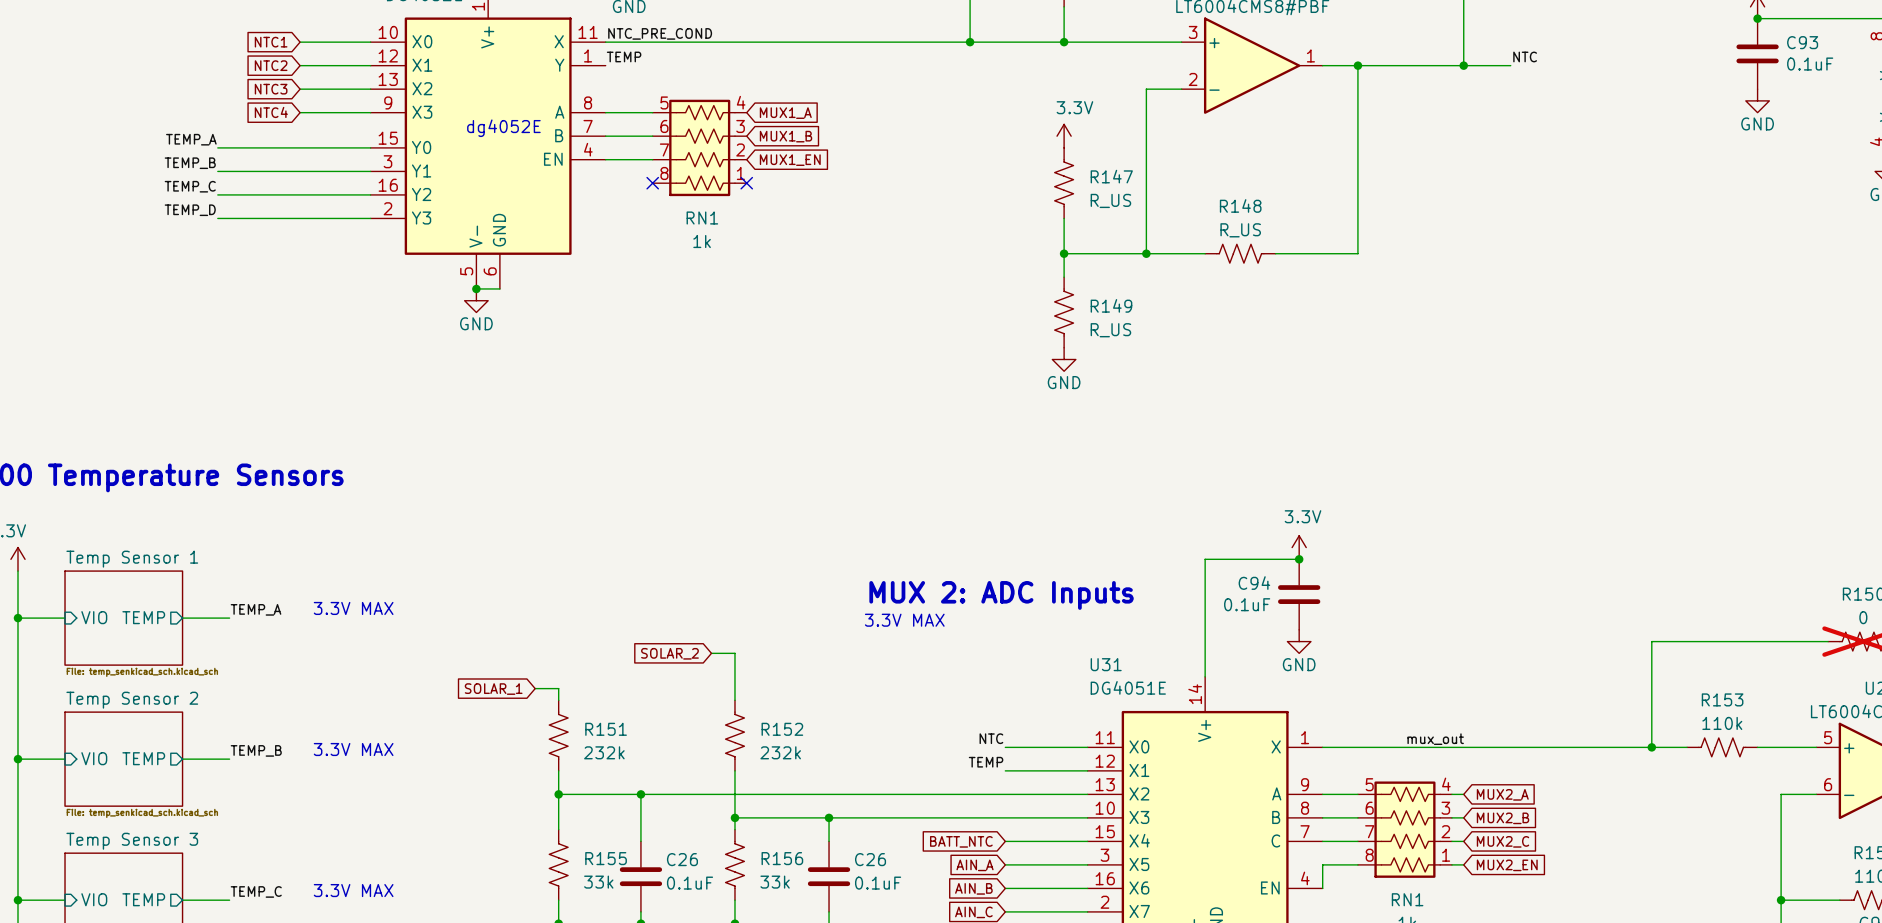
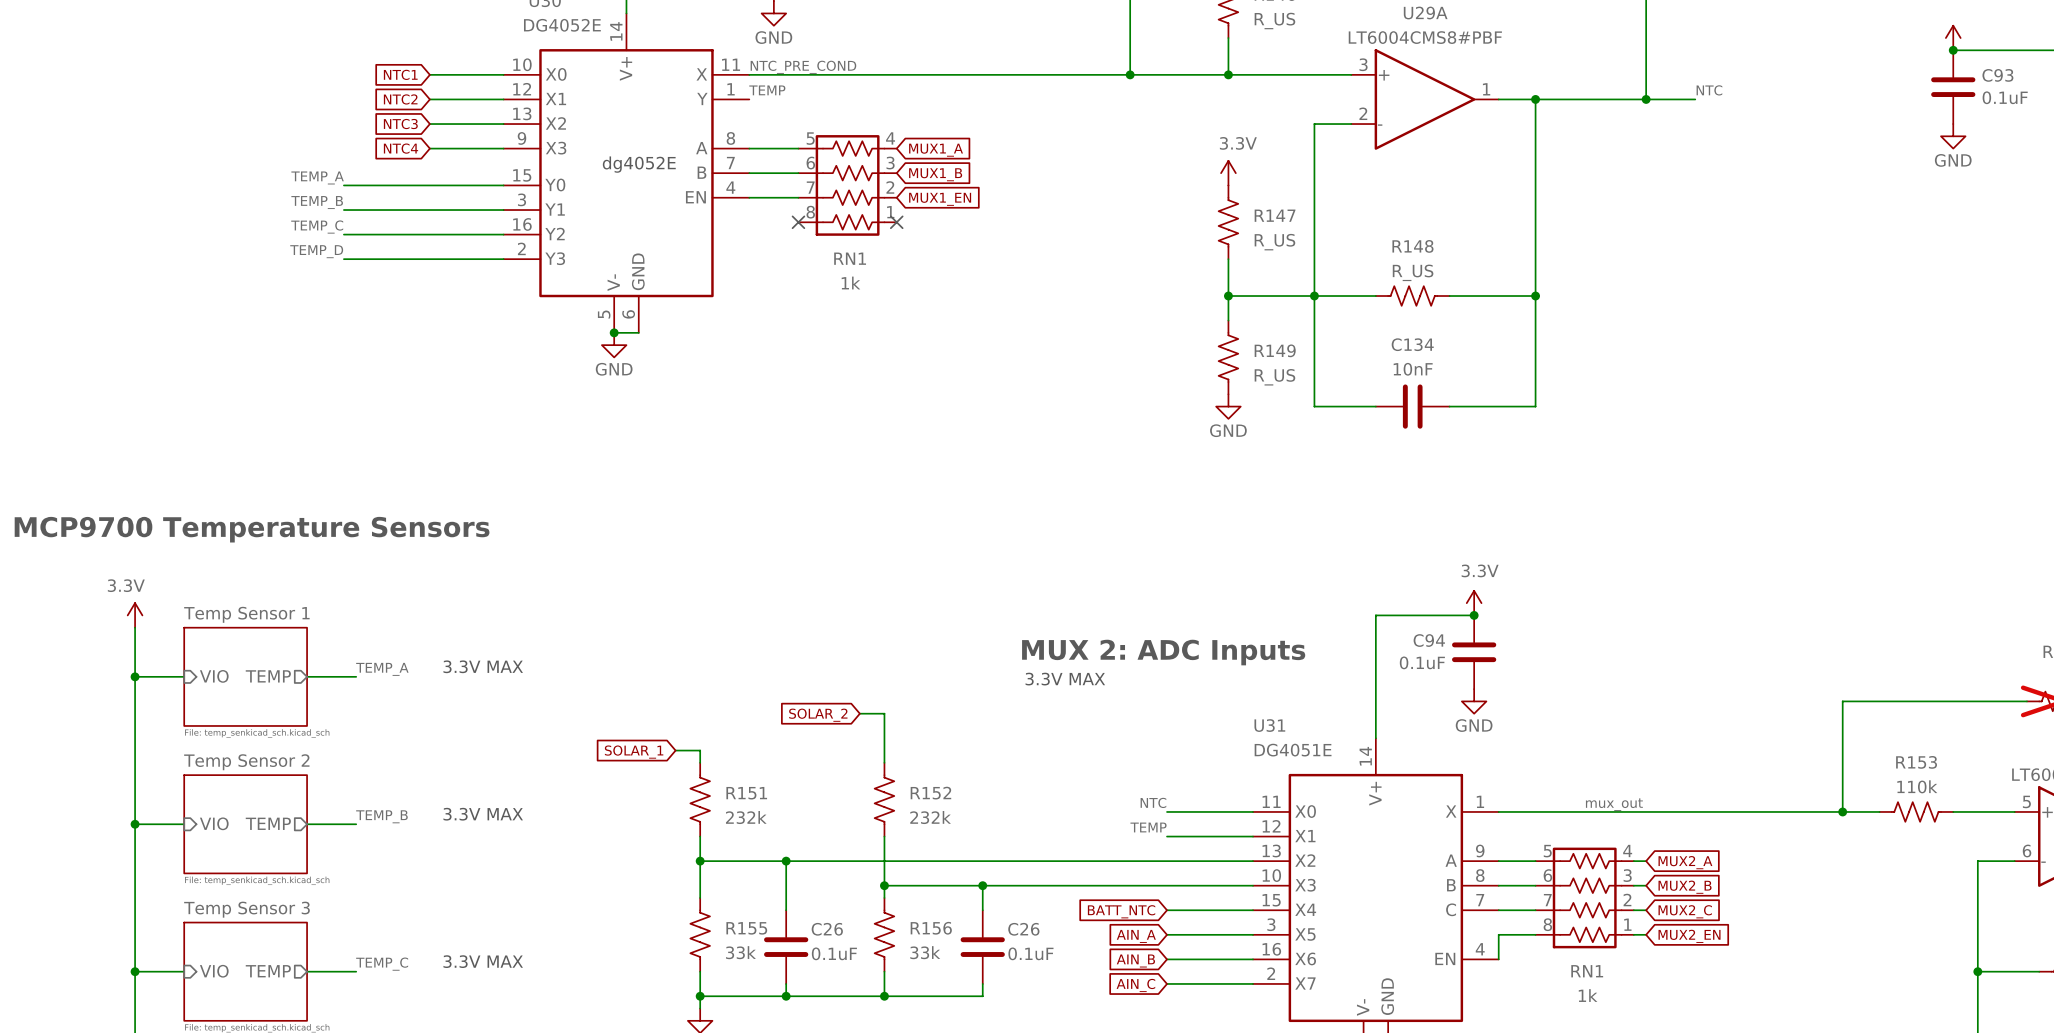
wire: none -> (1314, 296) (1314, 406) (1375, 406)
wire: none -> (1535, 296) (1535, 406) (1449, 406)
junction: none -> (1535, 296)
C134: none -> 10nF (1412, 406)

